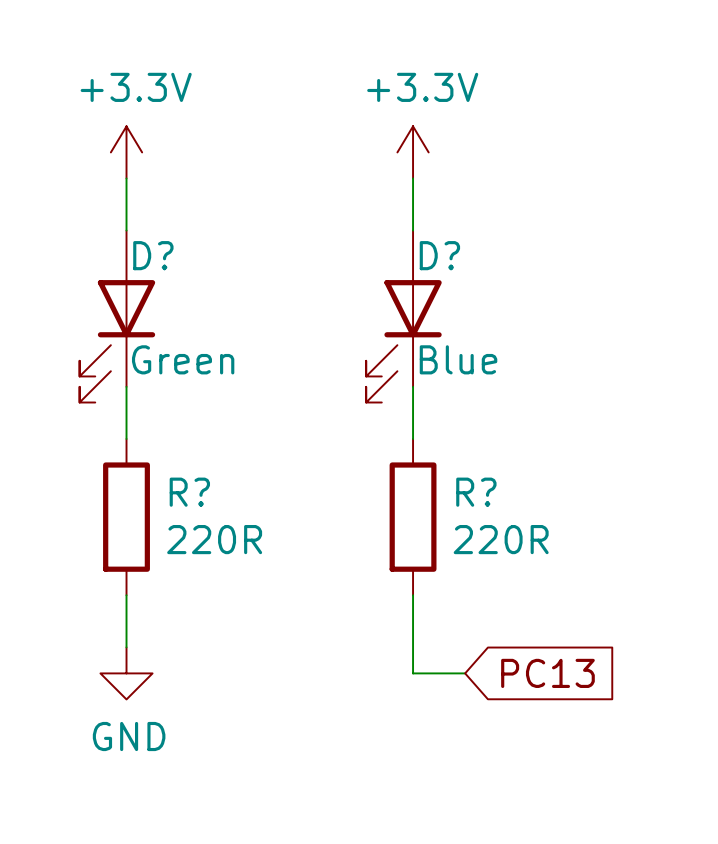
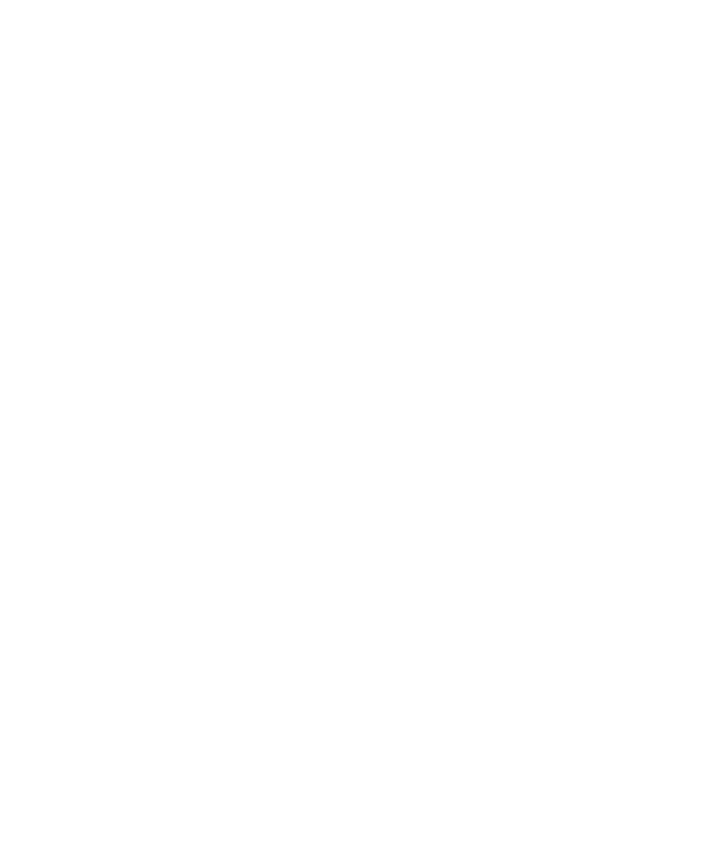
power symbol: +3.3V (126, 152) -> none
power symbol: +3.3V (413, 152) -> none
wire: (126, 178) (126, 230) -> none
wire: (413, 178) (413, 230) -> none
D?: (117, 316) -> none
D?: (403, 316) -> none
wire: (126, 386) (126, 438) -> none
wire: (413, 386) (413, 438) -> none
R?: (126, 517) -> none
R?: (413, 517) -> none
wire: (126, 595) (126, 647) -> none
wire: (413, 595) (413, 673) (465, 673) -> none
power symbol: GND (126, 673) -> none
global label: PC13 (547, 673) -> none

